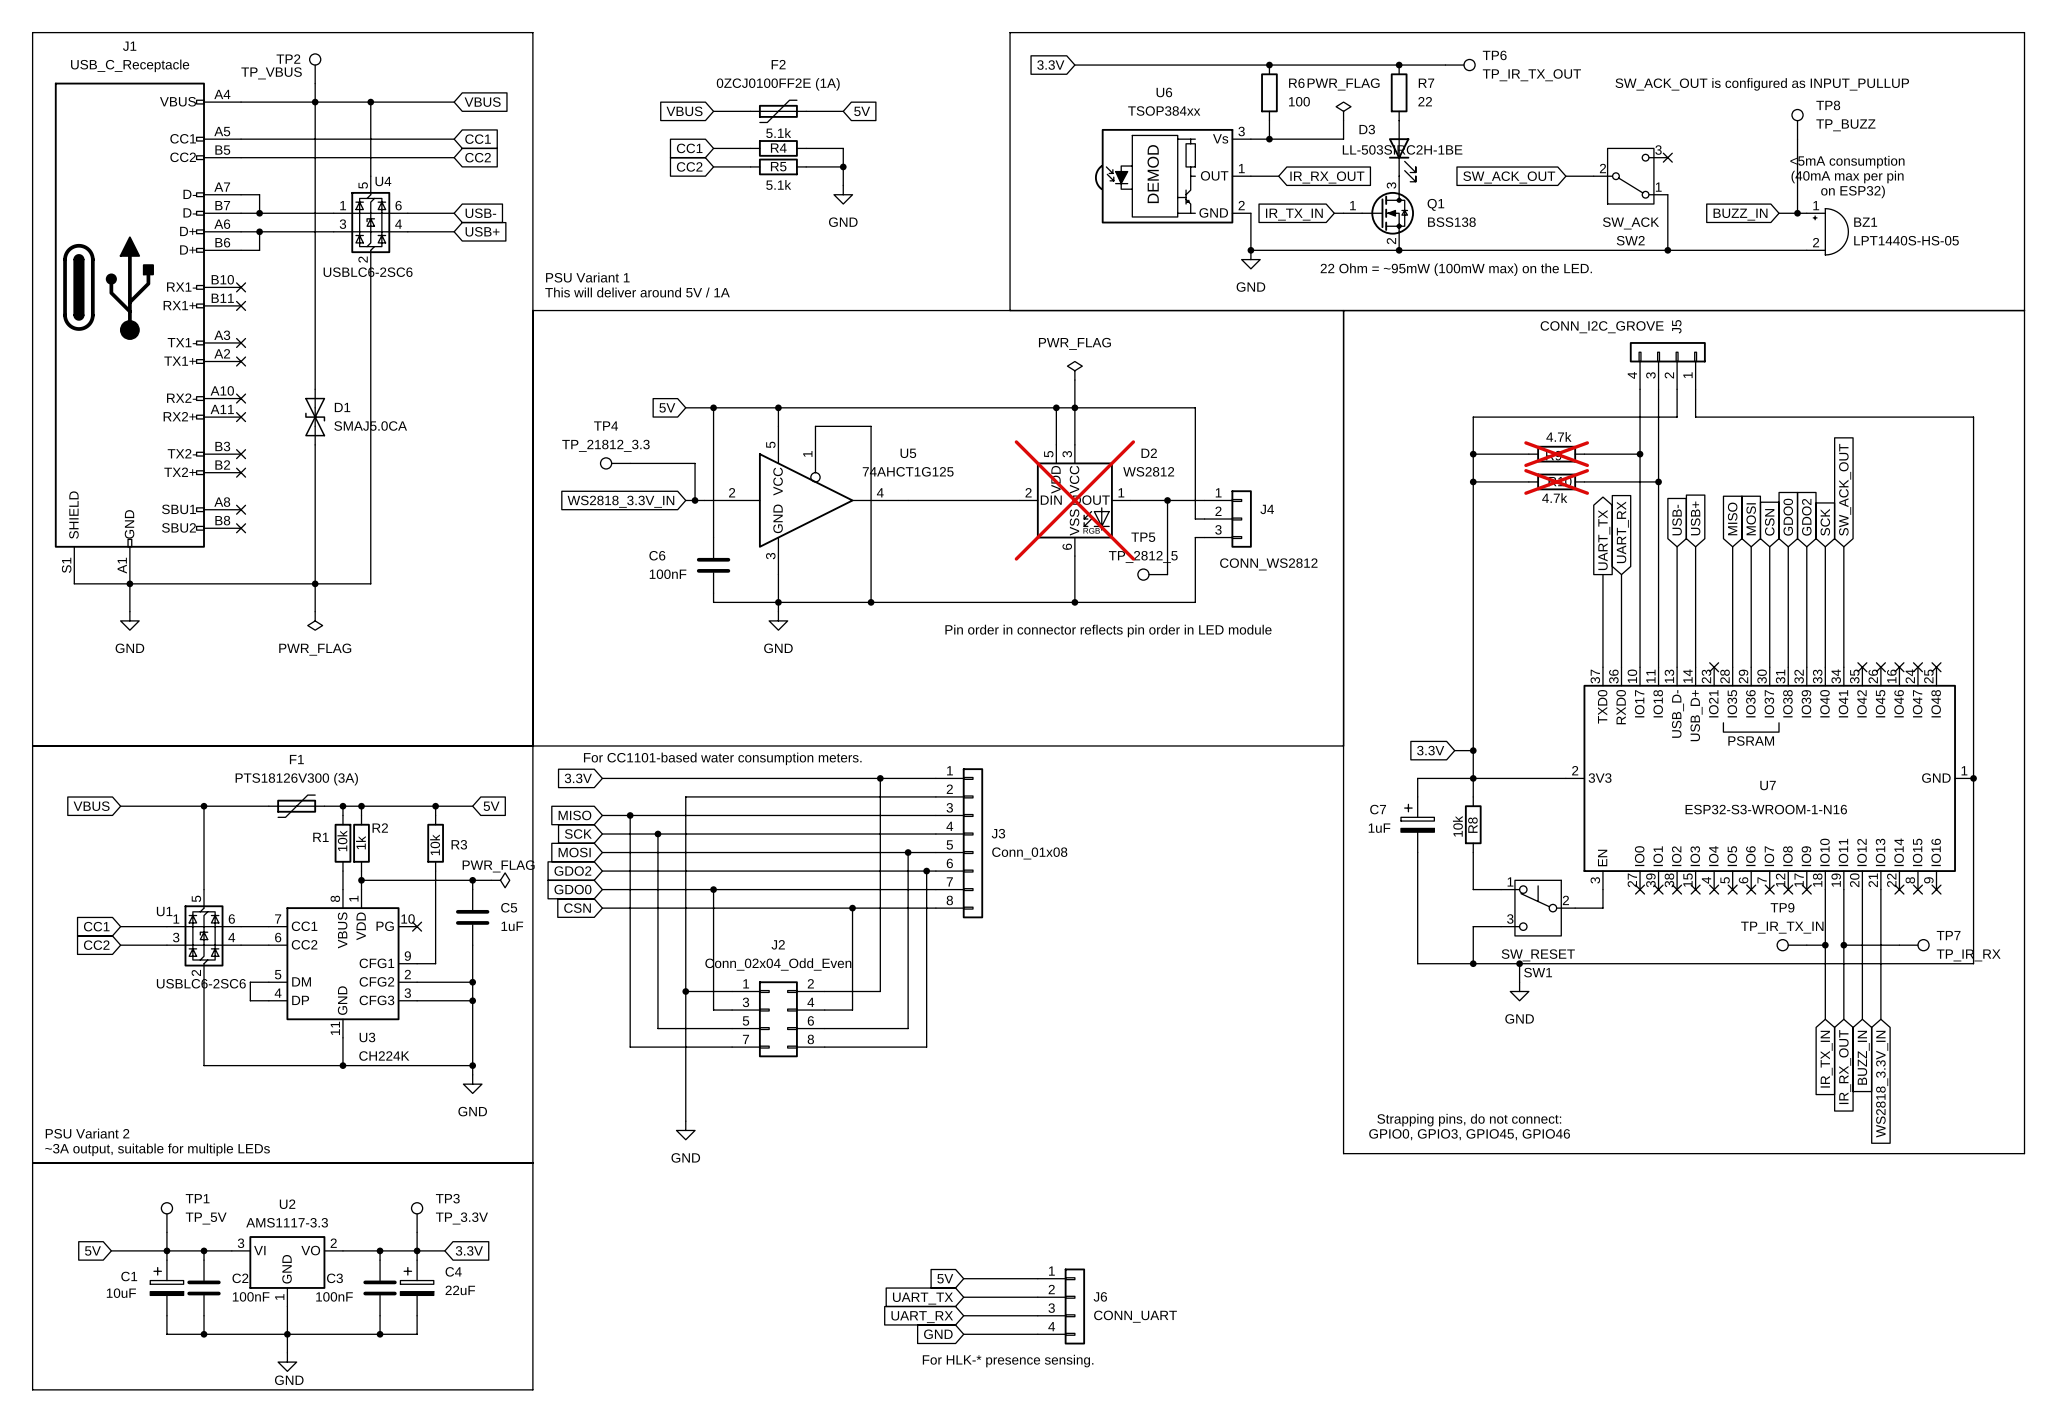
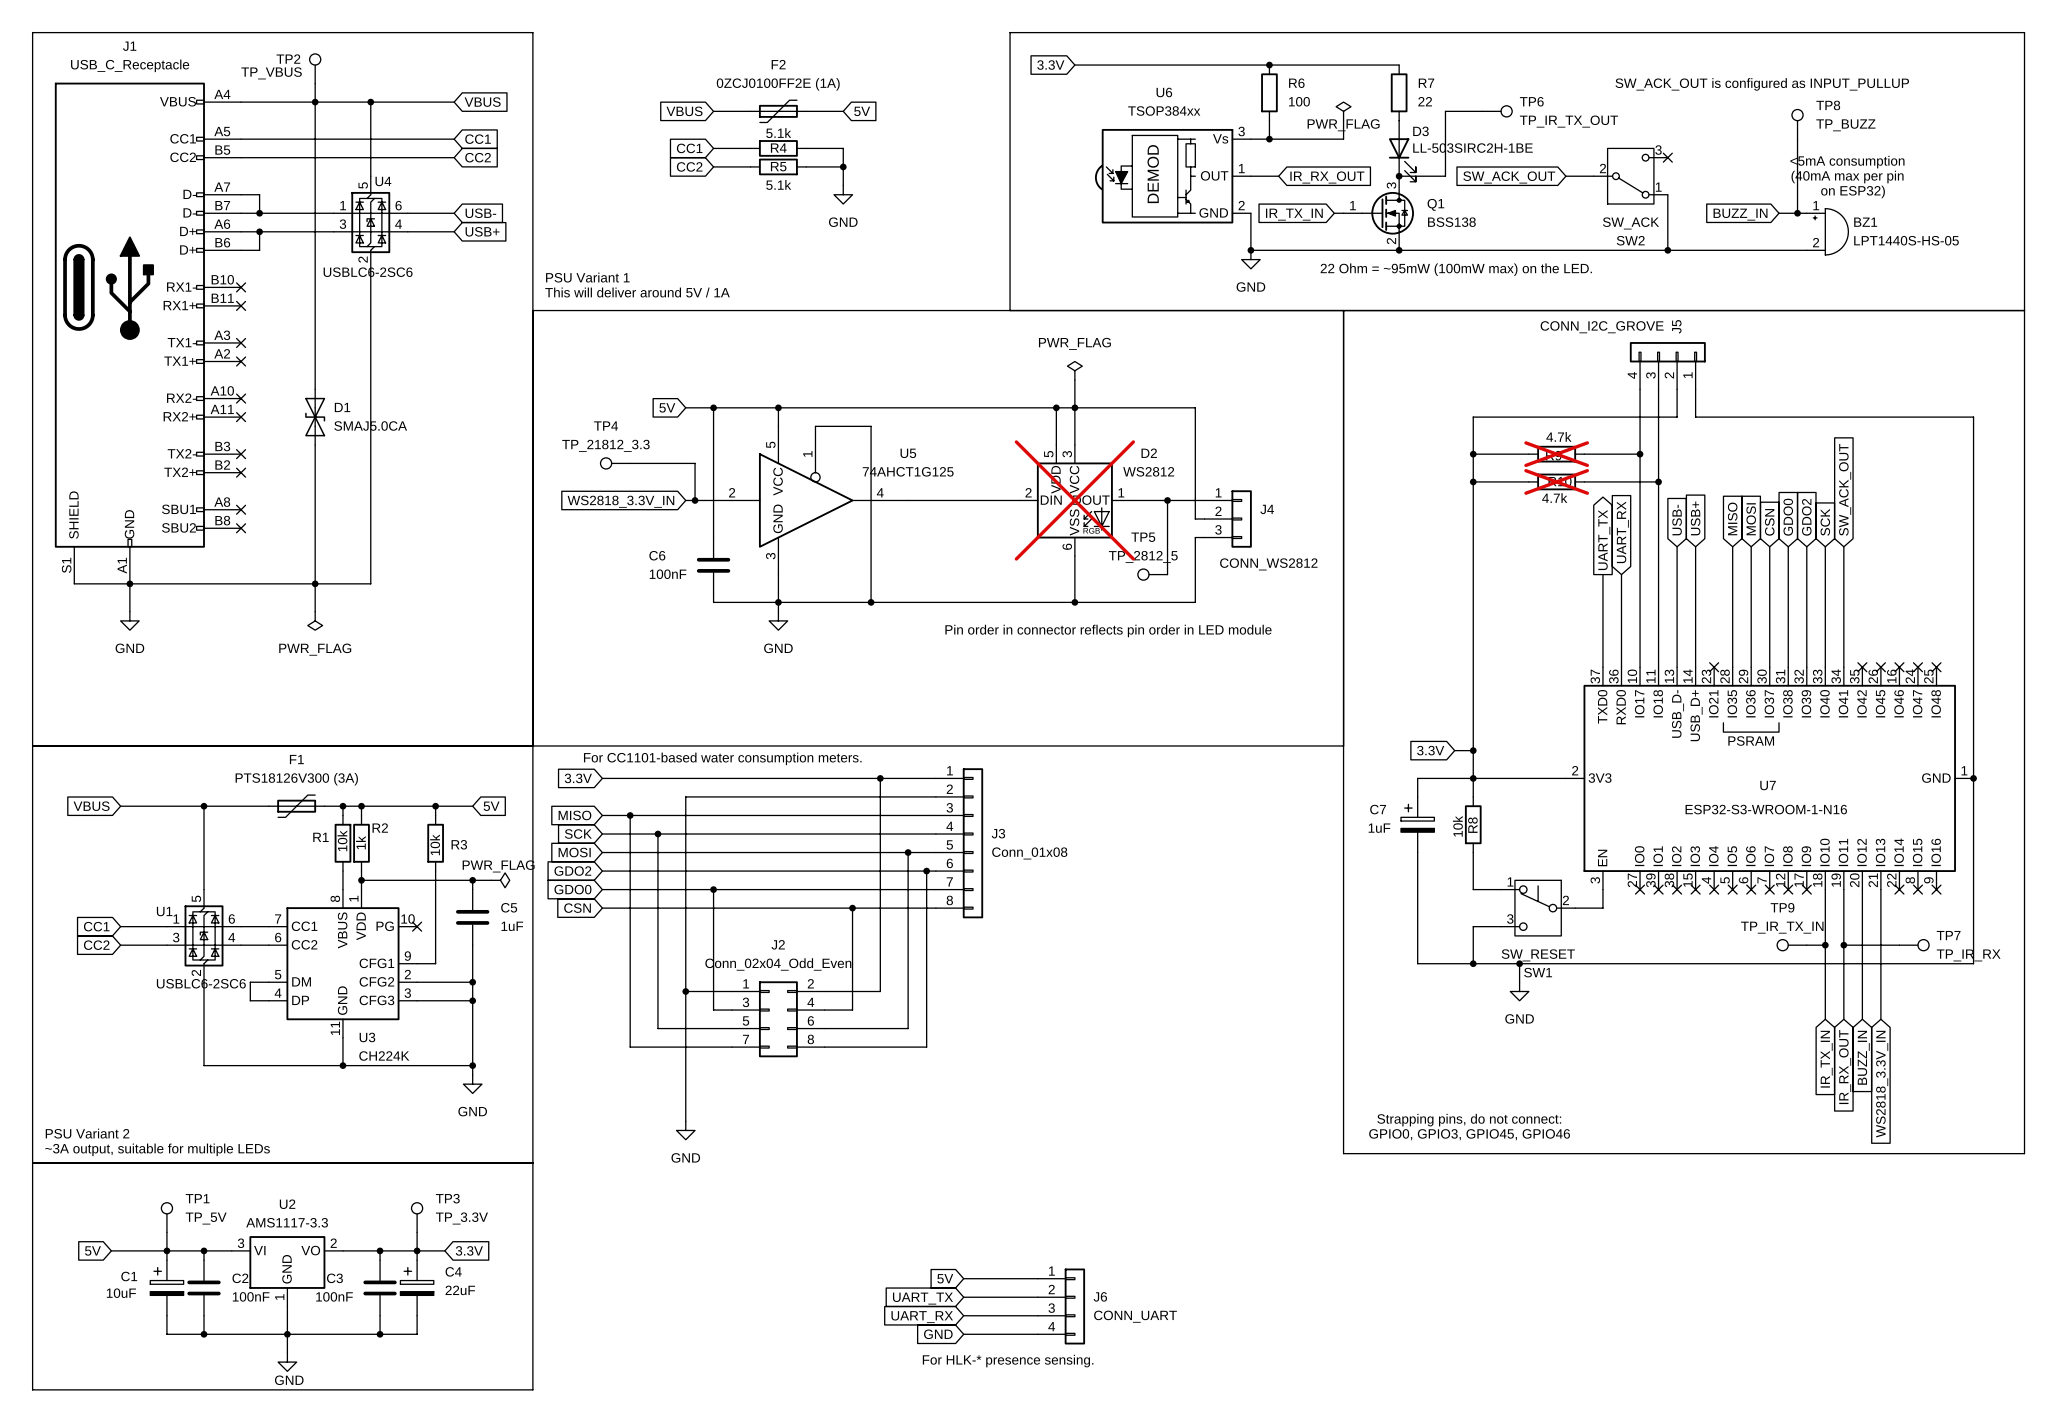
wire: (1399, 65) (1445, 65) -> none
junction: (1399, 65) -> none
TP6 position: (1460, 65) -> (1497, 111)
power symbol text position: PWR_FLAG (1343, 84) -> PWR_FLAG (1343, 125)
wire: none -> (1482, 111) (1445, 111) (1445, 176) (1399, 176)
D3 name position: D3 (1367, 129) -> D3 (1420, 131)
D3 value position: LL-503SIRC2H-1BE (1402, 149) -> LL-503SIRC2H-1BE (1473, 148)
junction: none -> (1399, 176)

